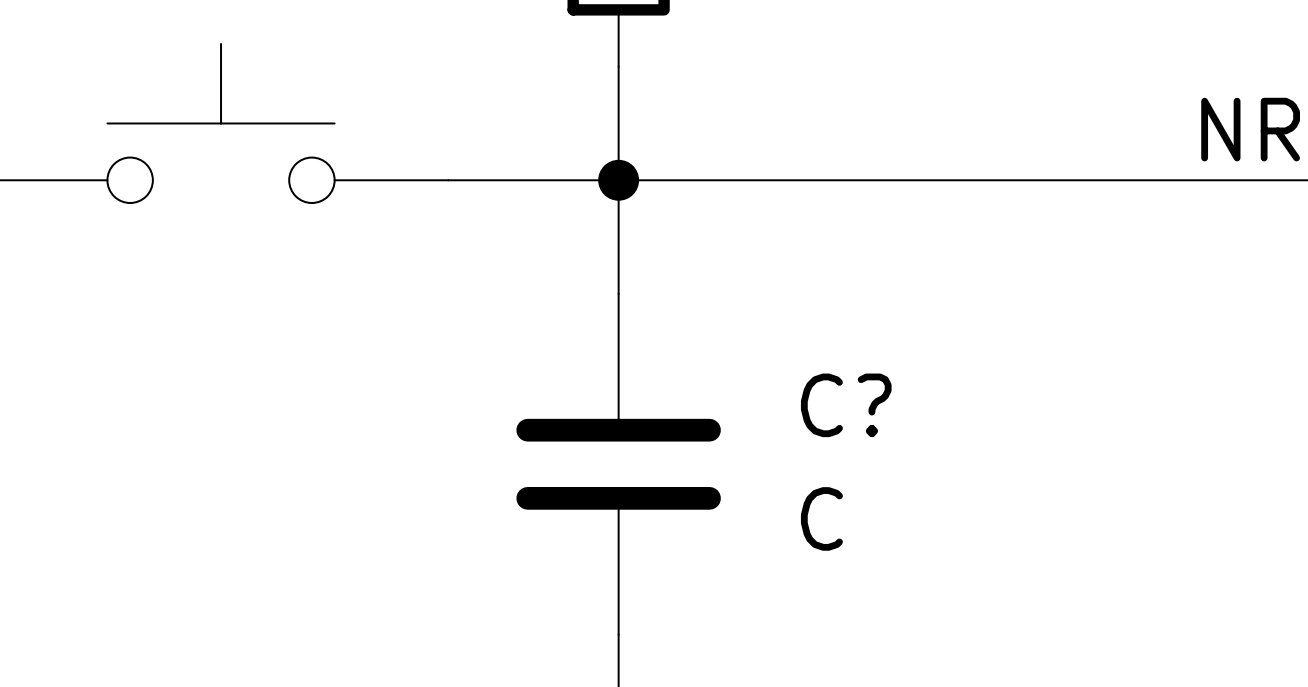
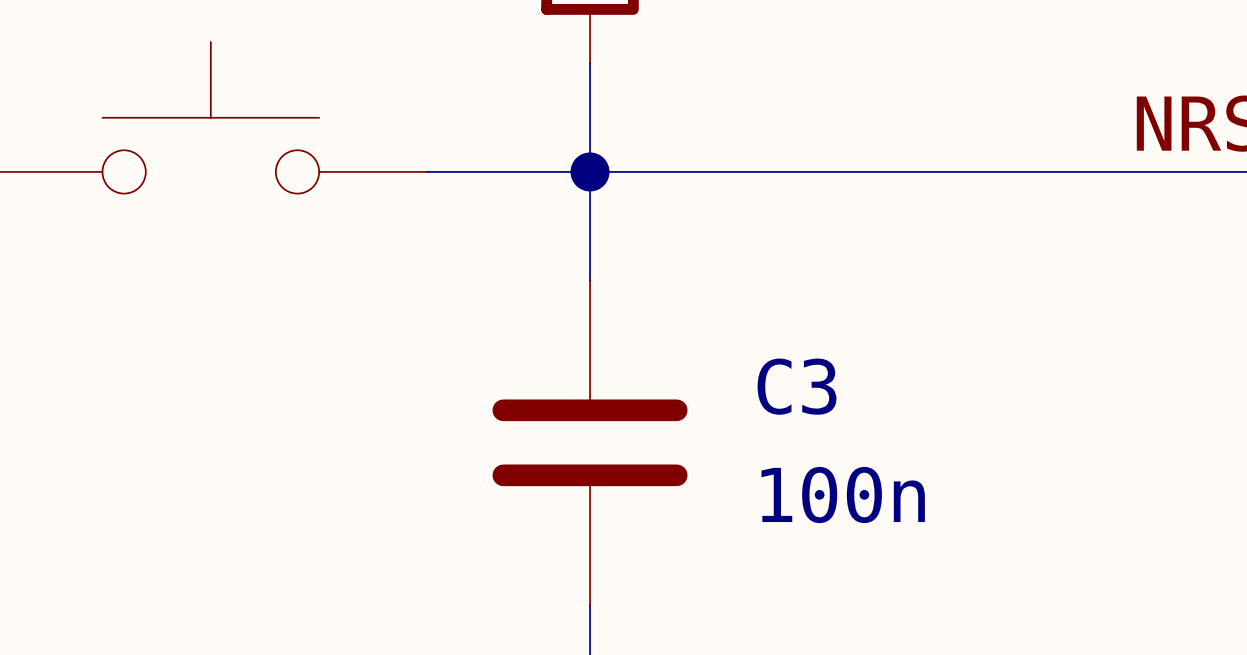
C? name: C? (846, 405) -> C3 (797, 386)
C? value: C (821, 518) -> 100n (843, 495)

